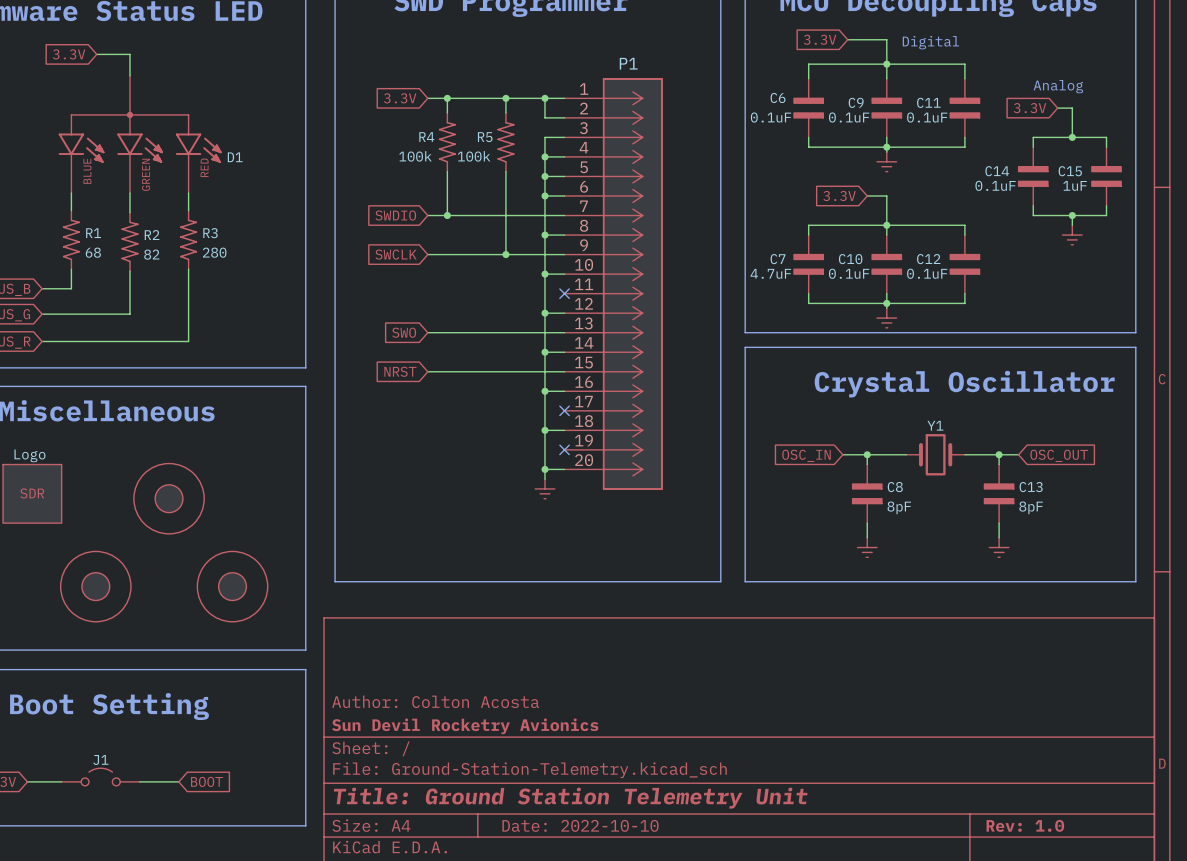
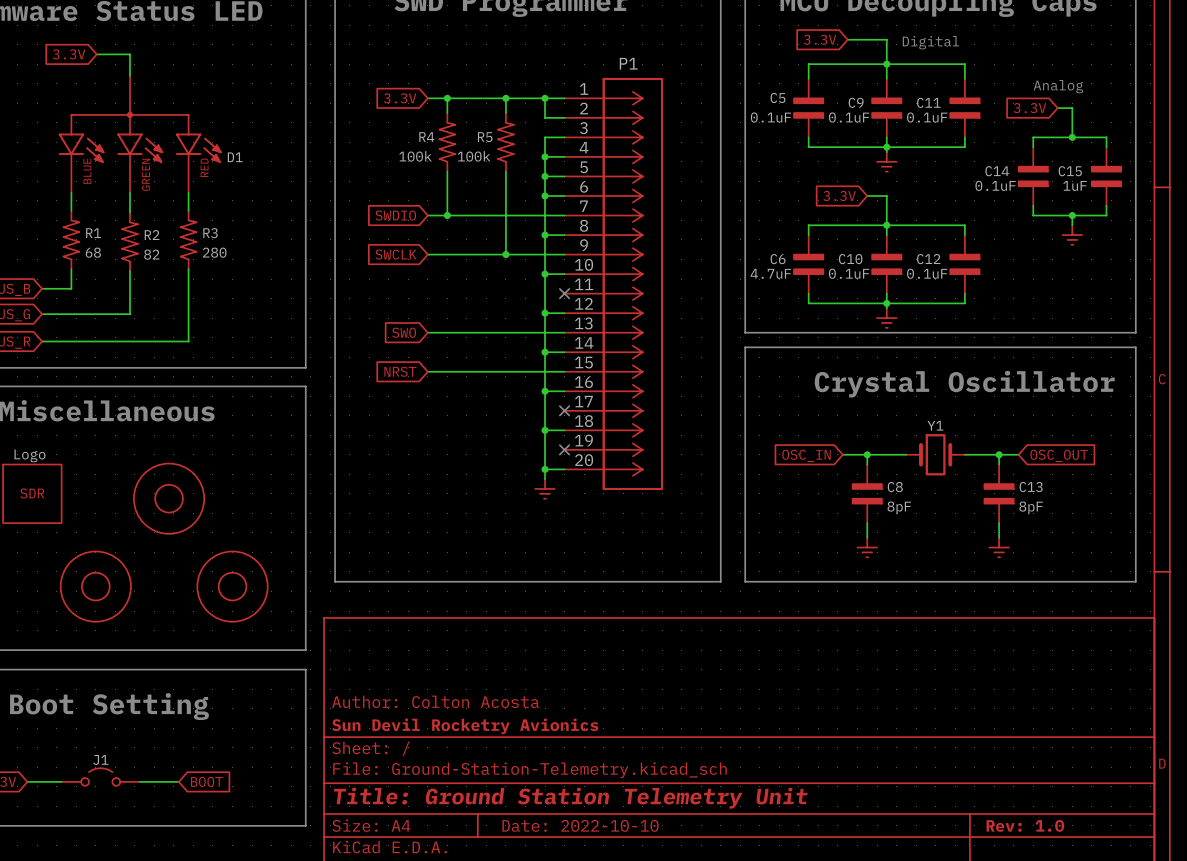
C6 name: C6 (778, 97) -> C5 (778, 97)
C7 name: C7 (778, 259) -> C6 (778, 259)

